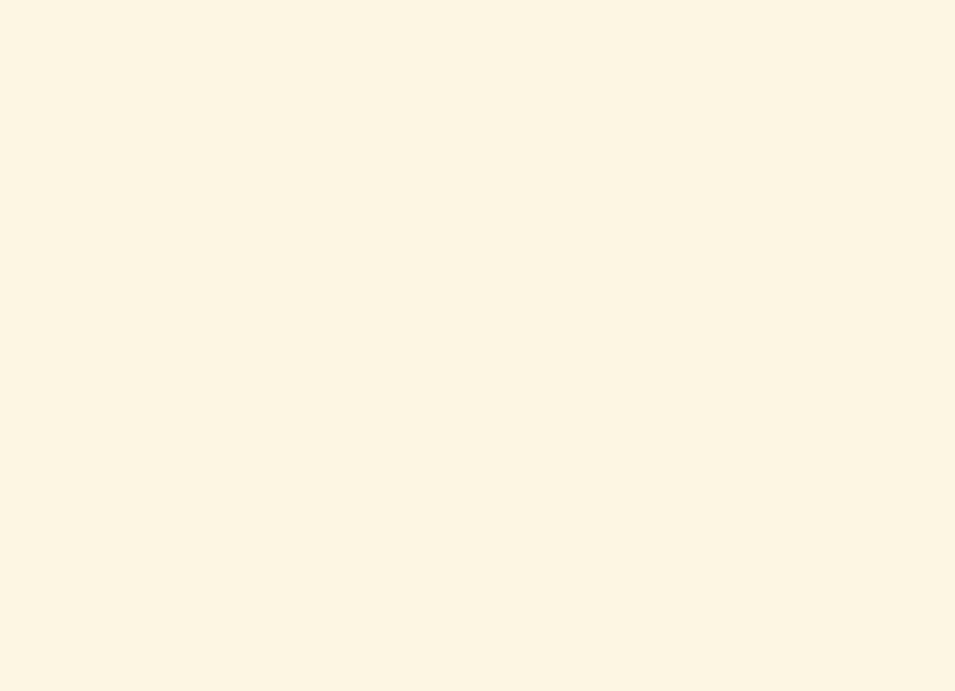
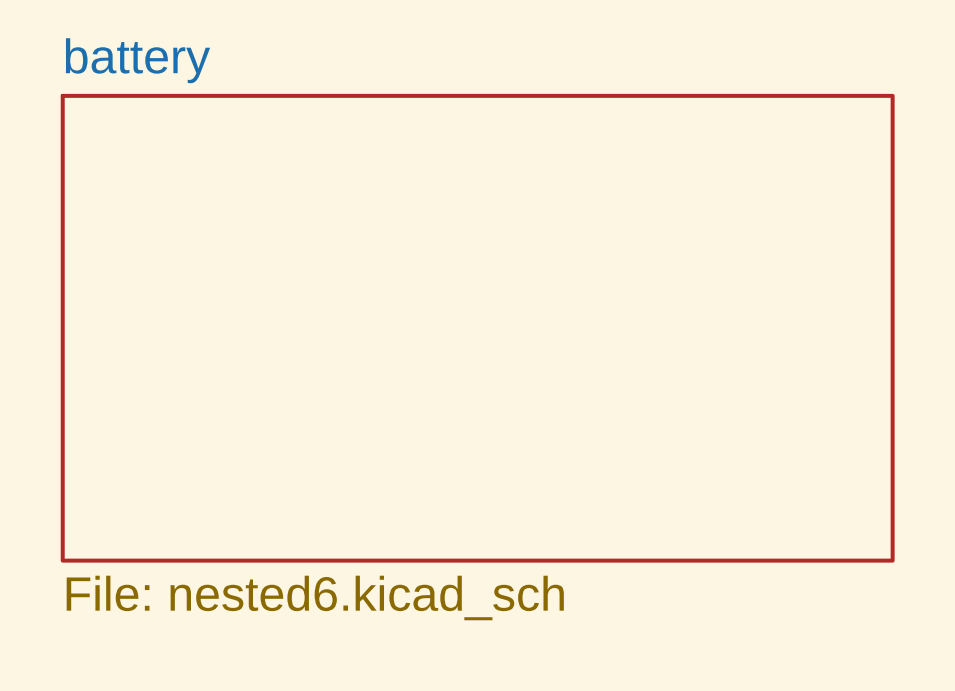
sheet battery: none -> File: nested6.kicad_sch (477, 328)

